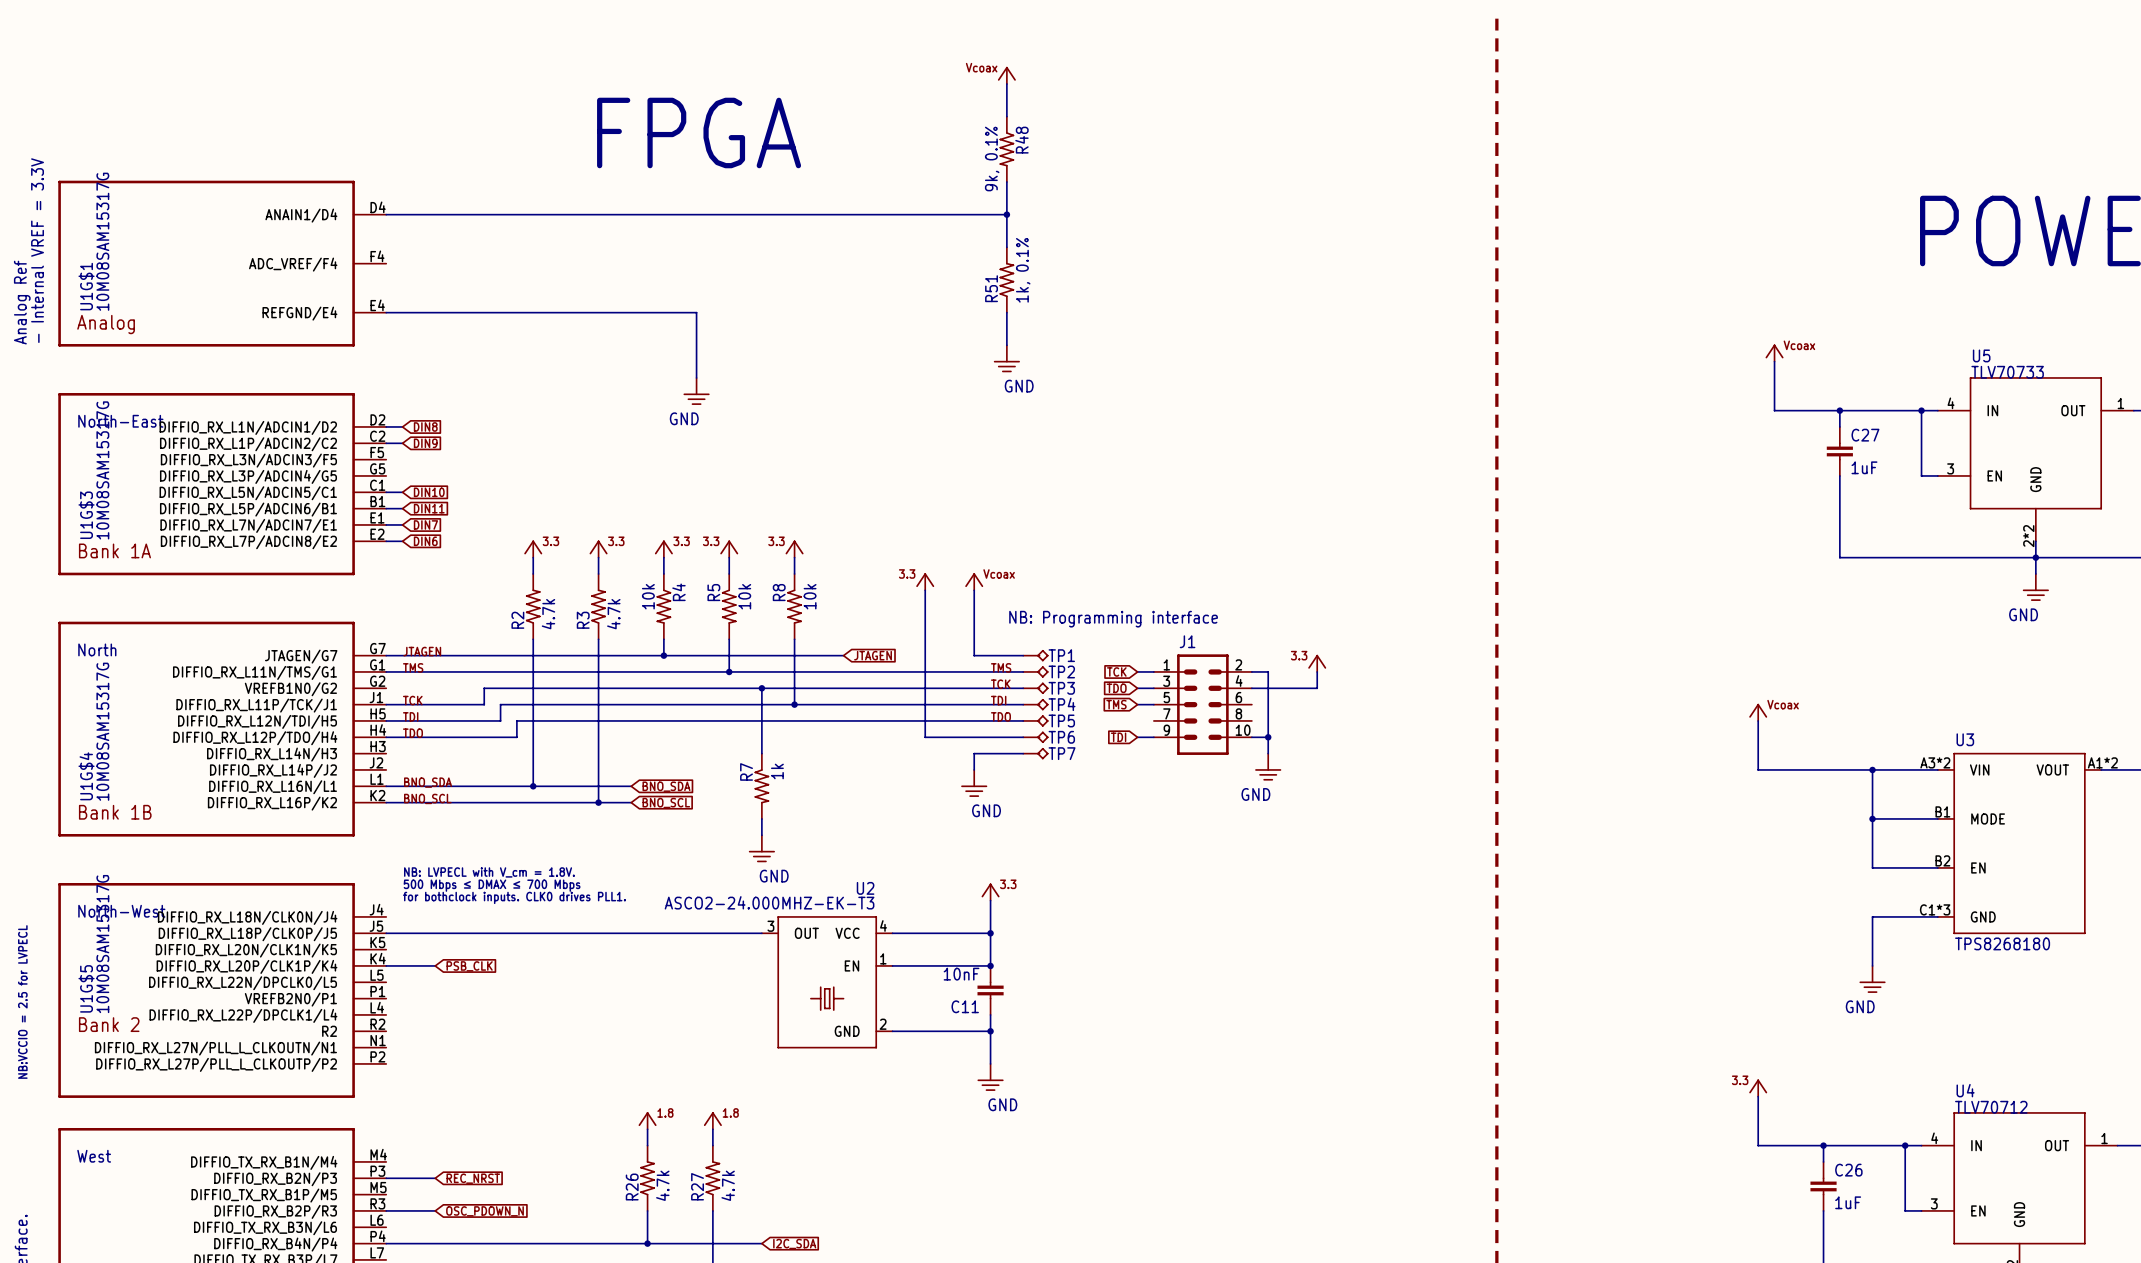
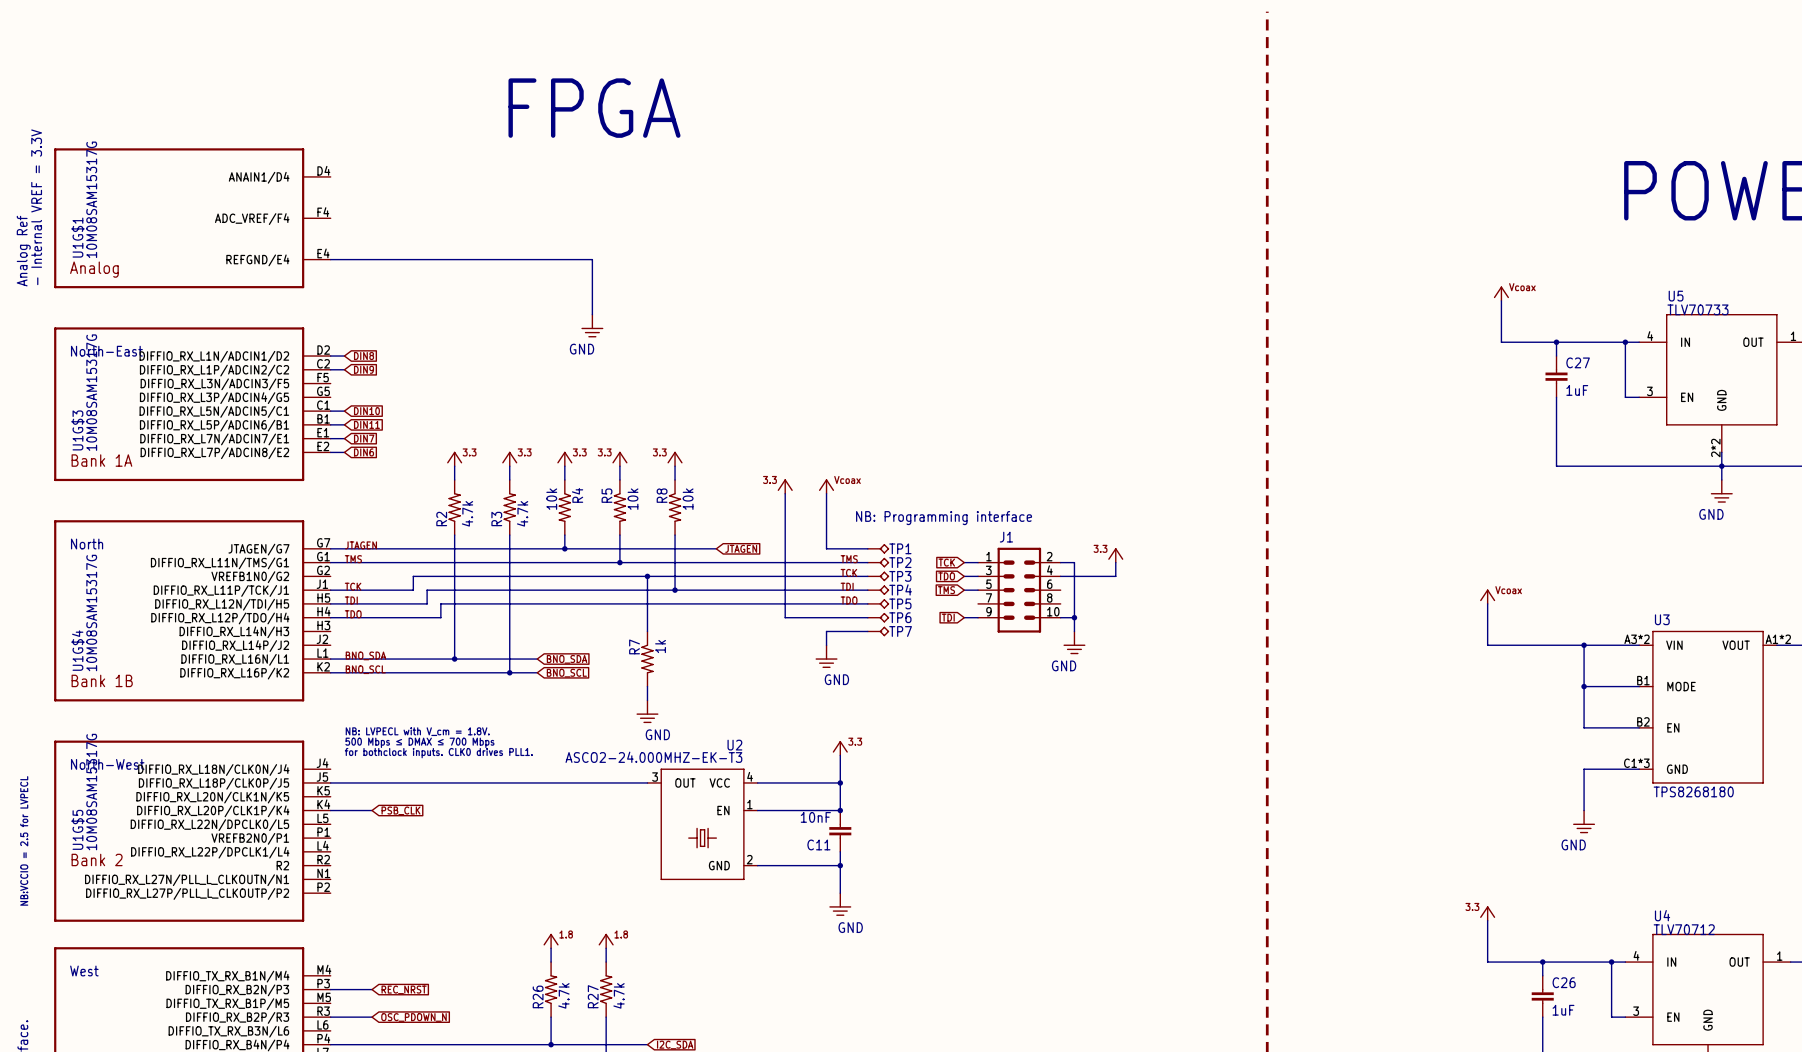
power symbol: (1006, 75) -> none
wire: (1006, 83) (1006, 116) -> none
R48: 9k, 0.1% (1006, 149) -> none
wire: (1006, 181) (1006, 247) -> none
wire: (386, 214) (1006, 214) -> none
junction: (1006, 214) -> none
R51: 1k, 0.1% (1006, 279) -> none
wire: (1006, 312) (1006, 345) -> none
power symbol: GND (1006, 358) -> none

